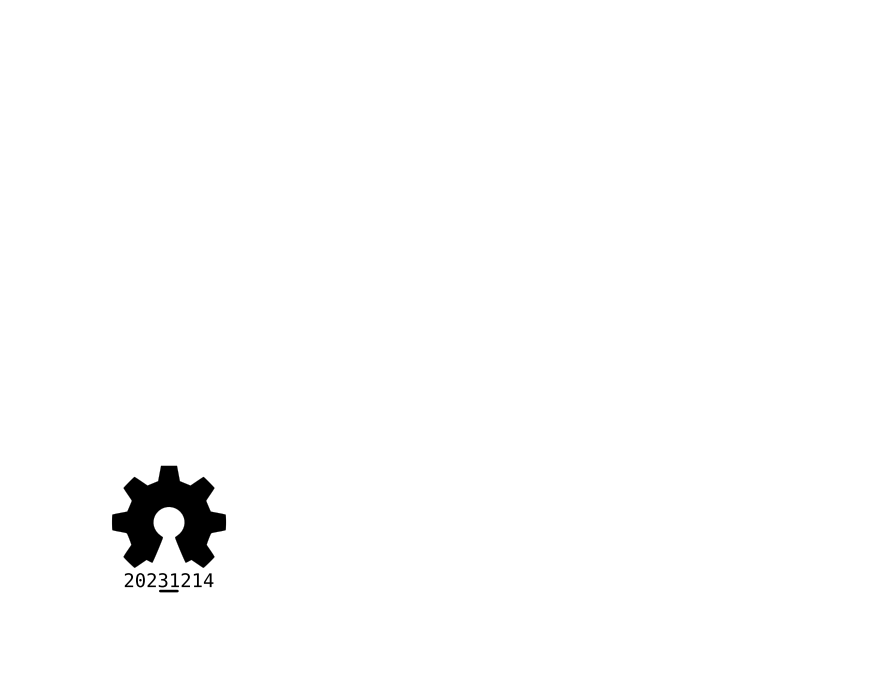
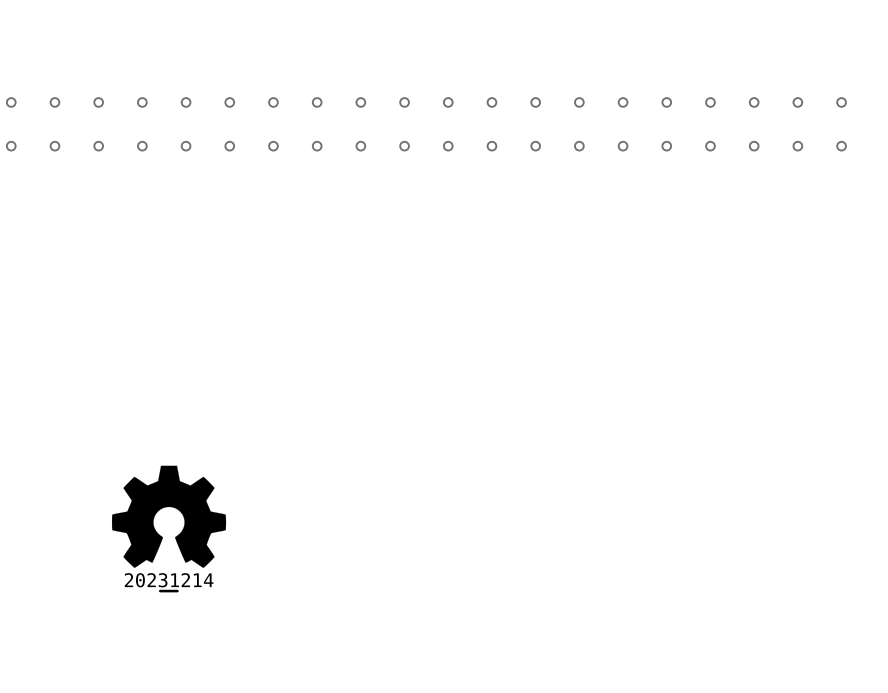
drawing: none -> [6, 97, 17, 108]
drawing: none -> [49, 97, 61, 108]
drawing: none -> [93, 97, 104, 108]
drawing: none -> [137, 97, 148, 108]
drawing: none -> [180, 97, 192, 108]
drawing: none -> [224, 97, 235, 108]
drawing: none -> [268, 97, 279, 108]
drawing: none -> [311, 97, 323, 108]
drawing: none -> [355, 97, 367, 108]
drawing: none -> [399, 97, 410, 108]
drawing: none -> [443, 97, 454, 108]
drawing: none -> [486, 97, 498, 108]
drawing: none -> [530, 97, 541, 108]
drawing: none -> [574, 97, 585, 108]
drawing: none -> [617, 97, 629, 108]
drawing: none -> [661, 97, 673, 108]
drawing: none -> [705, 97, 716, 108]
drawing: none -> [748, 97, 760, 108]
drawing: none -> [792, 97, 804, 108]
drawing: none -> [836, 97, 847, 108]
drawing: none -> [6, 140, 17, 152]
drawing: none -> [49, 140, 61, 152]
drawing: none -> [93, 140, 104, 152]
drawing: none -> [137, 140, 148, 152]
drawing: none -> [180, 140, 192, 152]
drawing: none -> [224, 140, 235, 152]
drawing: none -> [268, 140, 279, 152]
drawing: none -> [311, 140, 323, 152]
drawing: none -> [355, 140, 367, 152]
drawing: none -> [399, 140, 410, 152]
drawing: none -> [443, 140, 454, 152]
drawing: none -> [486, 140, 498, 152]
drawing: none -> [530, 140, 541, 152]
drawing: none -> [574, 140, 585, 152]
drawing: none -> [617, 140, 629, 152]
drawing: none -> [661, 140, 673, 152]
drawing: none -> [705, 140, 716, 152]
drawing: none -> [748, 140, 760, 152]
drawing: none -> [792, 140, 804, 152]
drawing: none -> [836, 140, 847, 152]

